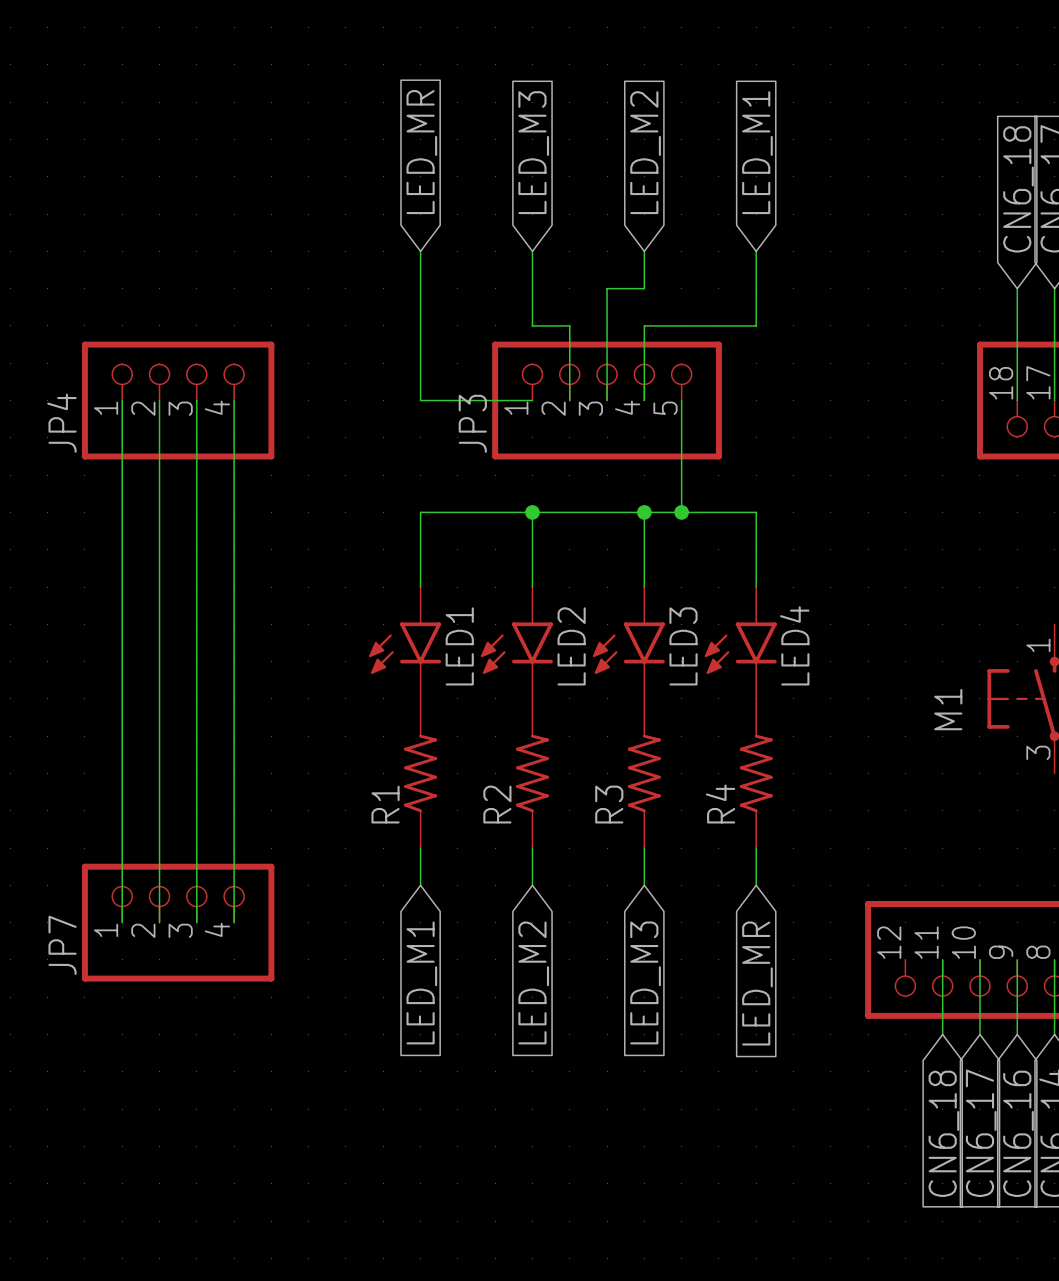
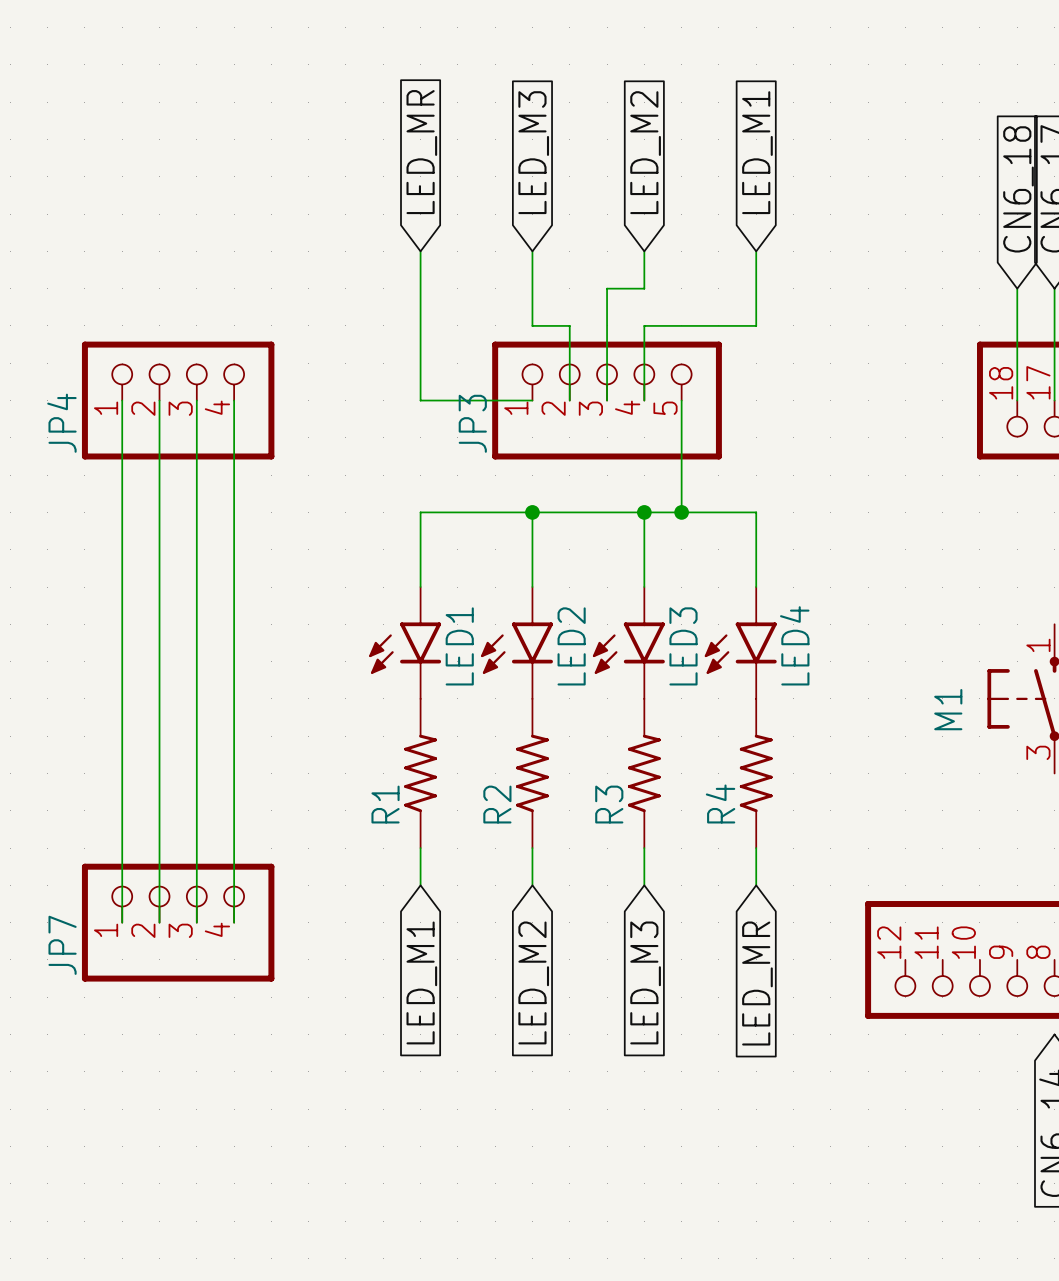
wire: (942, 959) (942, 1034) -> none
wire: (979, 959) (979, 1034) -> none
wire: (1017, 959) (1017, 1034) -> none
wire: (1054, 959) (1054, 1034) -> none
global label: CN6_18 (943, 1133) -> none
global label: CN6_17 (981, 1133) -> none
global label: CN6_16 (1018, 1133) -> none

